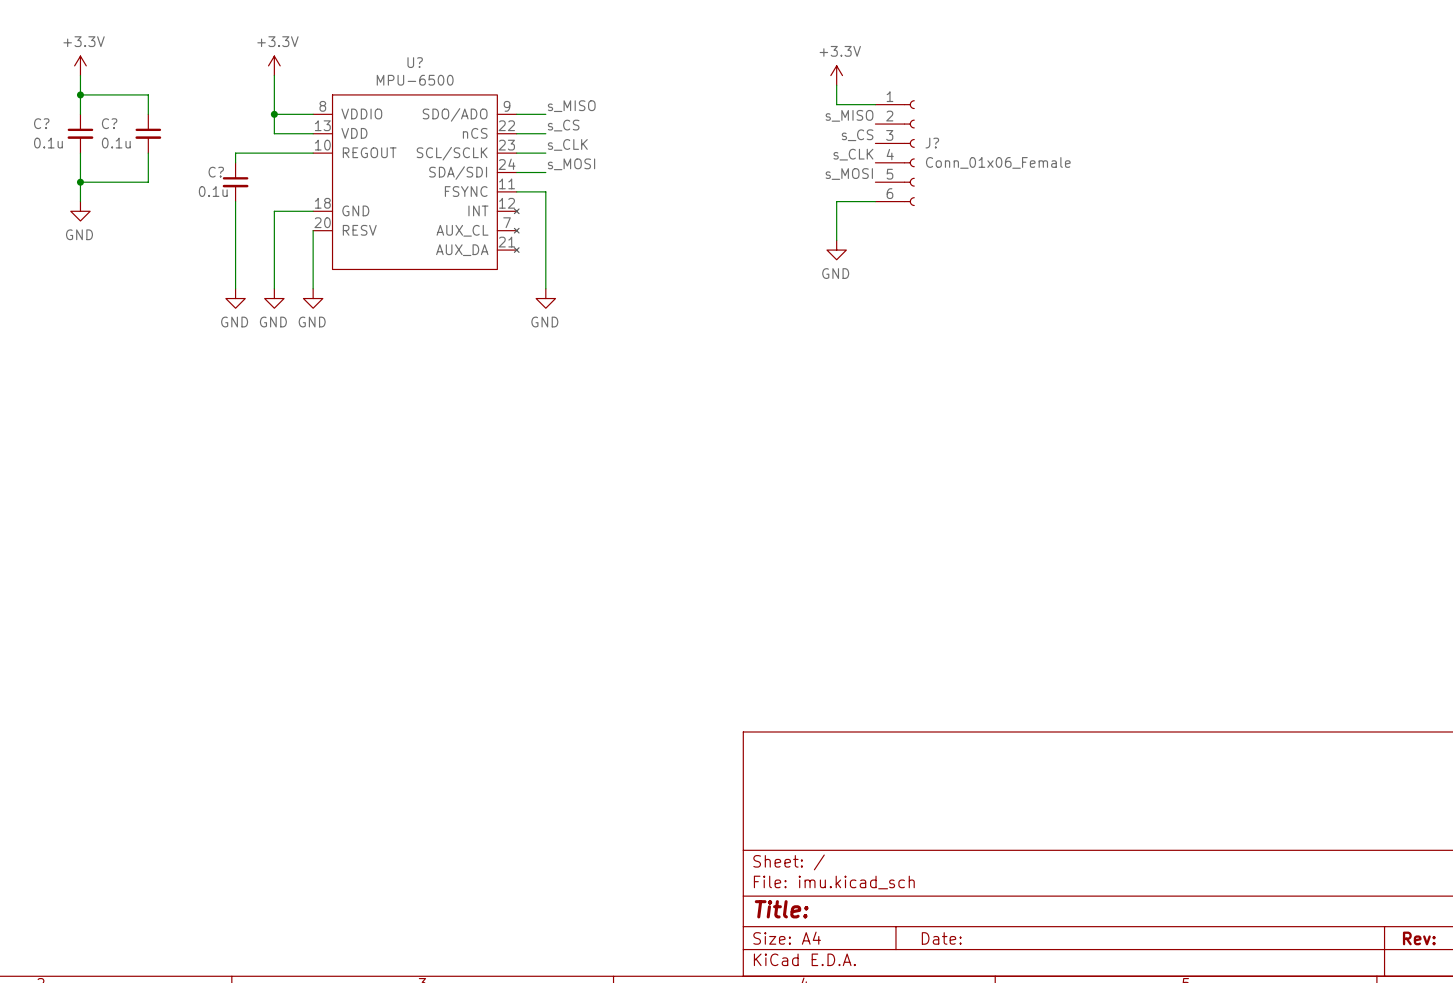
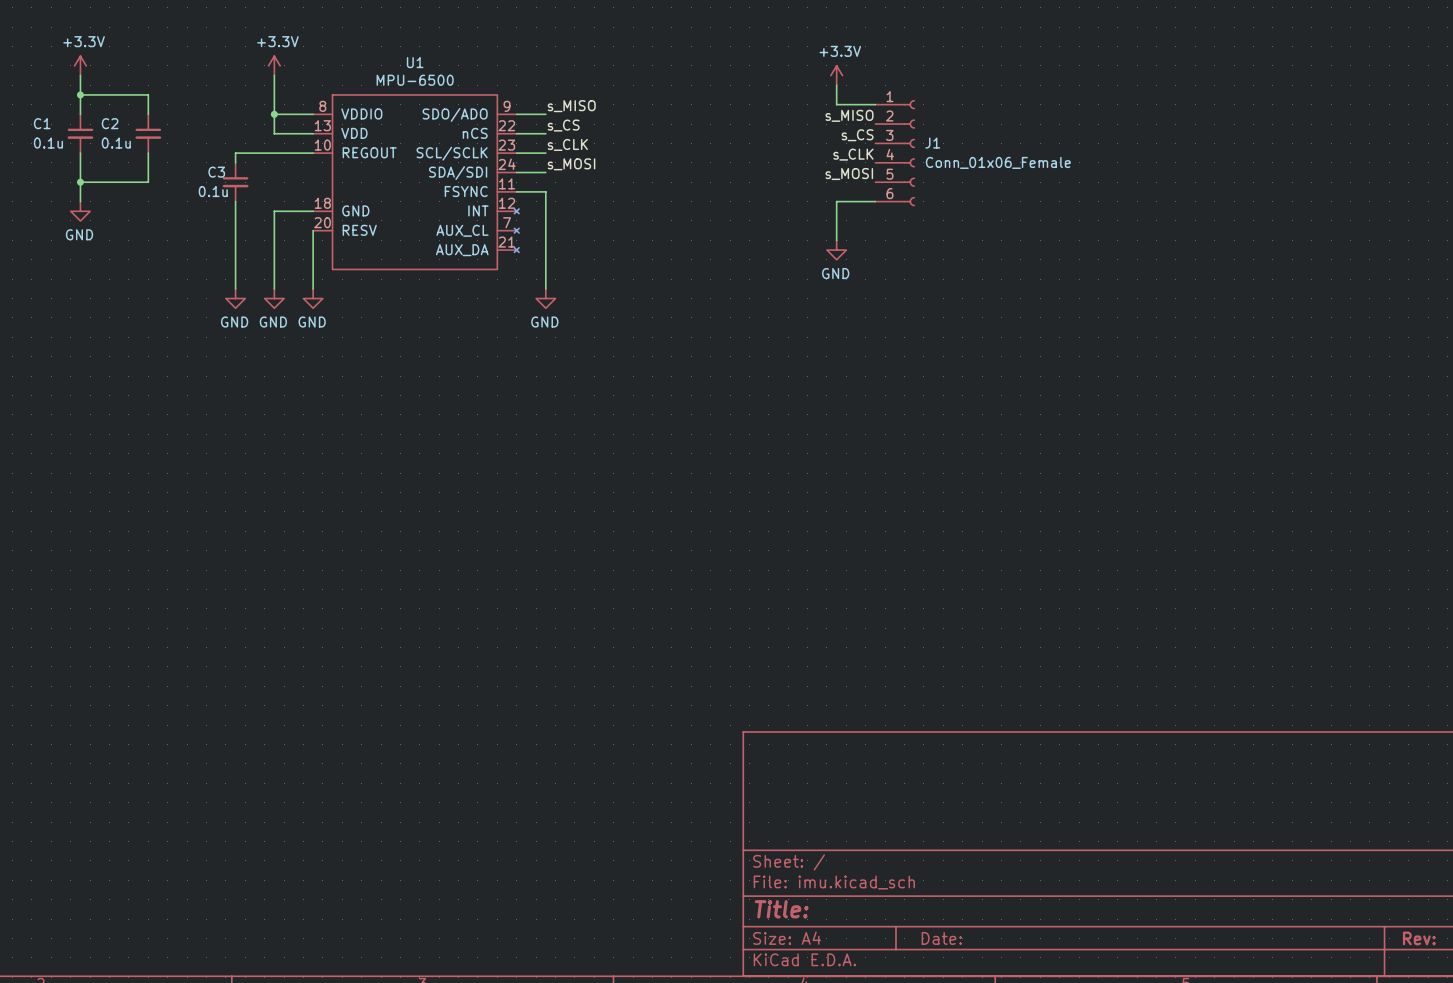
U? name: U? (415, 62) -> U1 (415, 62)
C? name: C? (41, 123) -> C1 (42, 123)
C? name: C? (109, 123) -> C2 (110, 123)
J? name: J? (932, 143) -> J1 (932, 143)
C? name: C? (216, 172) -> C3 (216, 172)

